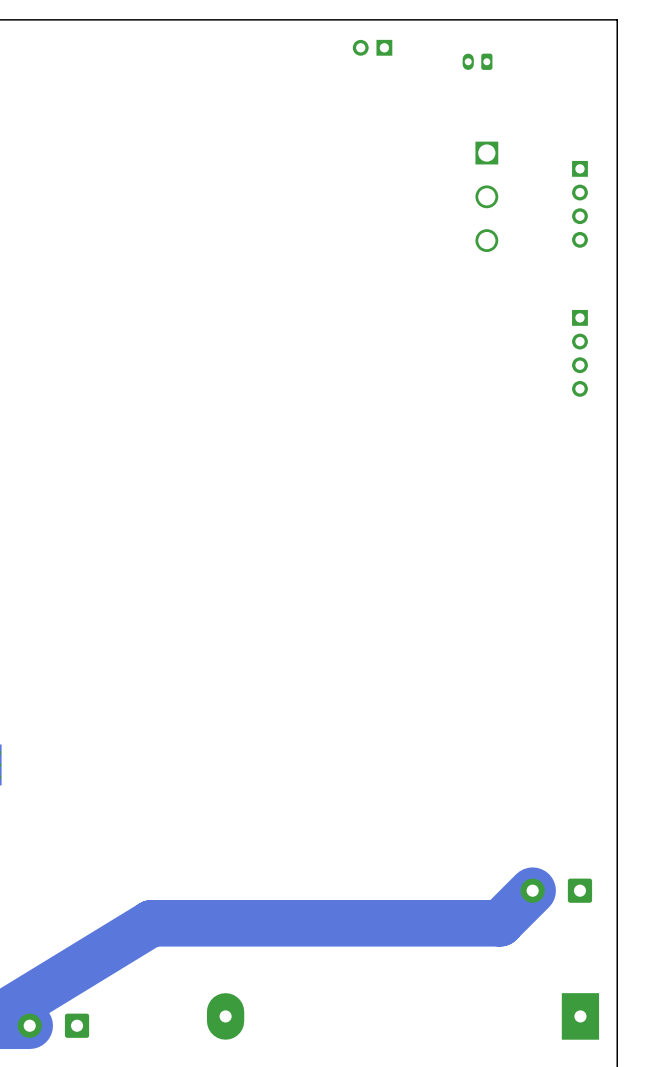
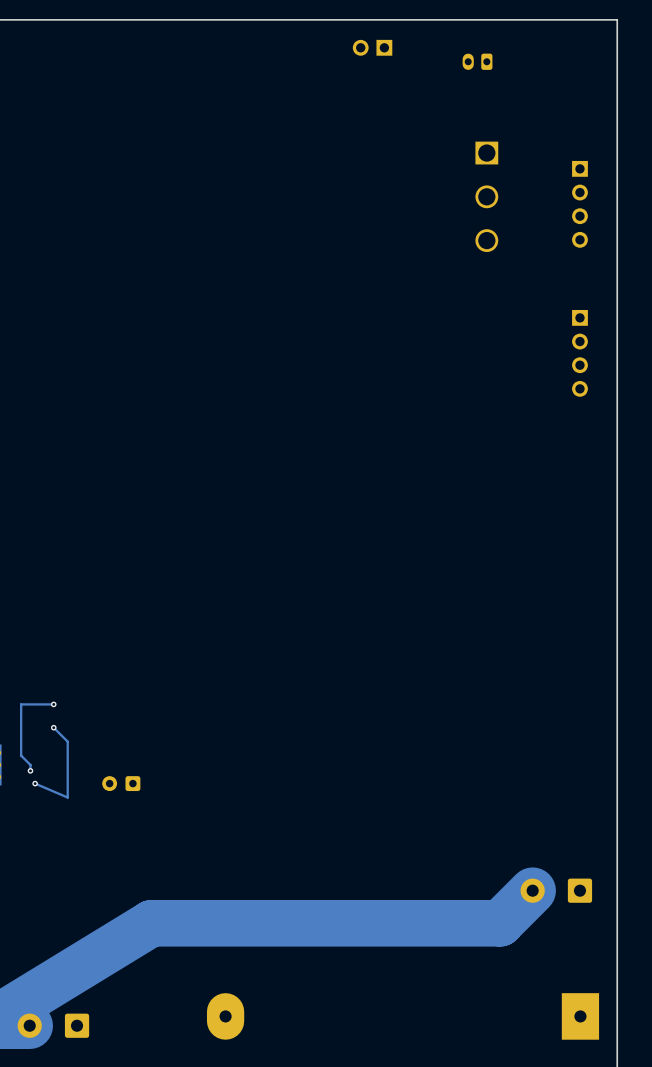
track: none -> (53, 704) (21, 704) (21, 755) (30, 764) (30, 770)
via: none -> (53, 704)
track: none -> (53, 727) (67, 741) (67, 797) (35, 783)
via: none -> (53, 727)
via: none -> (30, 770)
via: none -> (35, 783)
part: none -> (121, 783)

